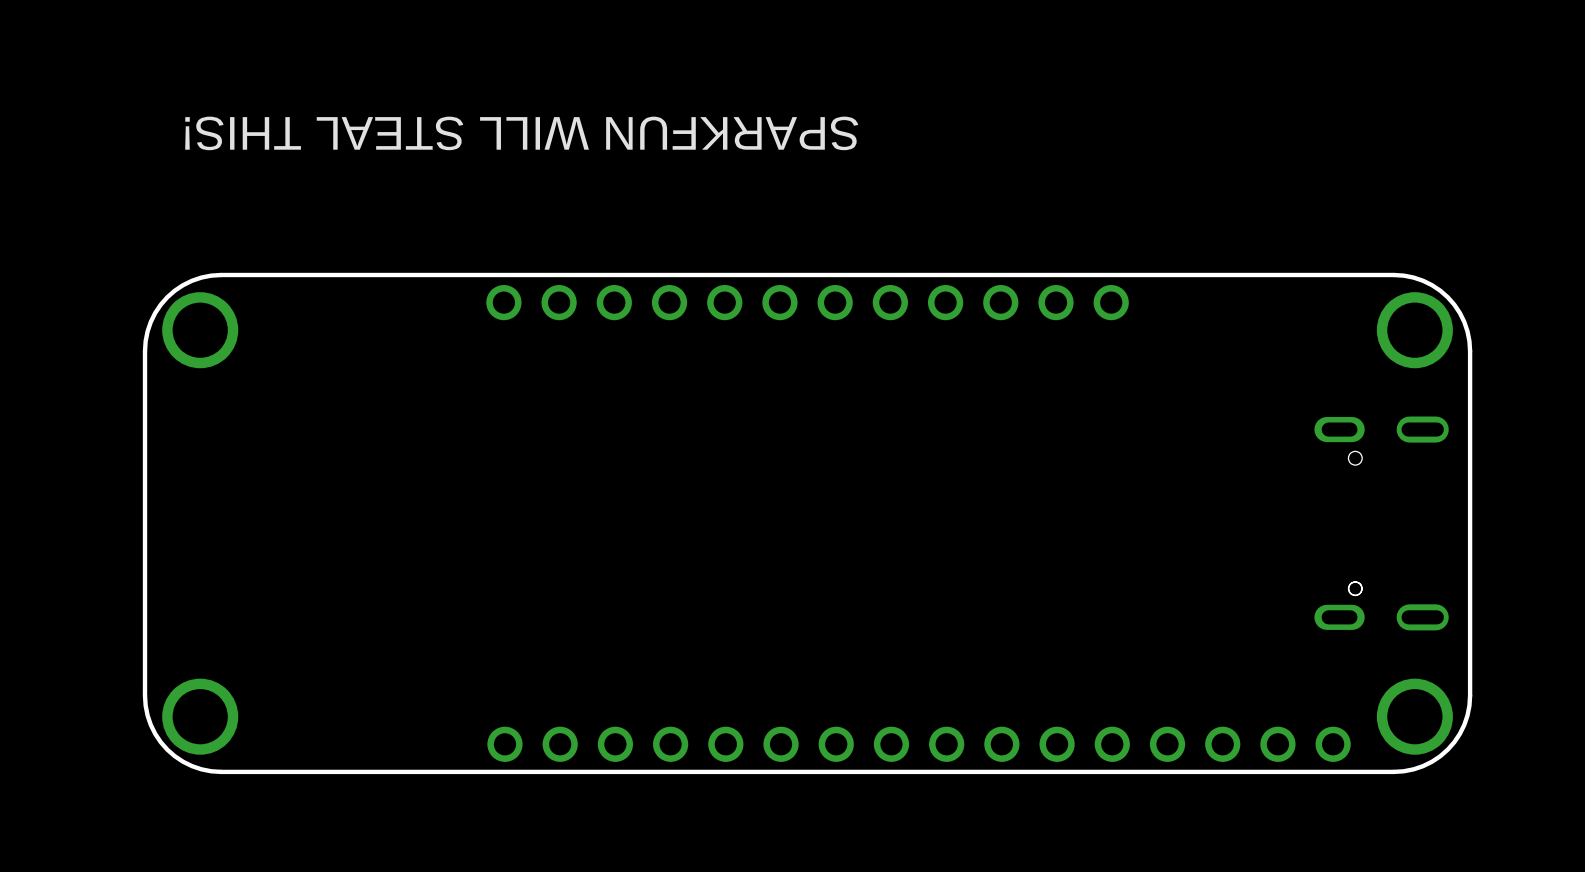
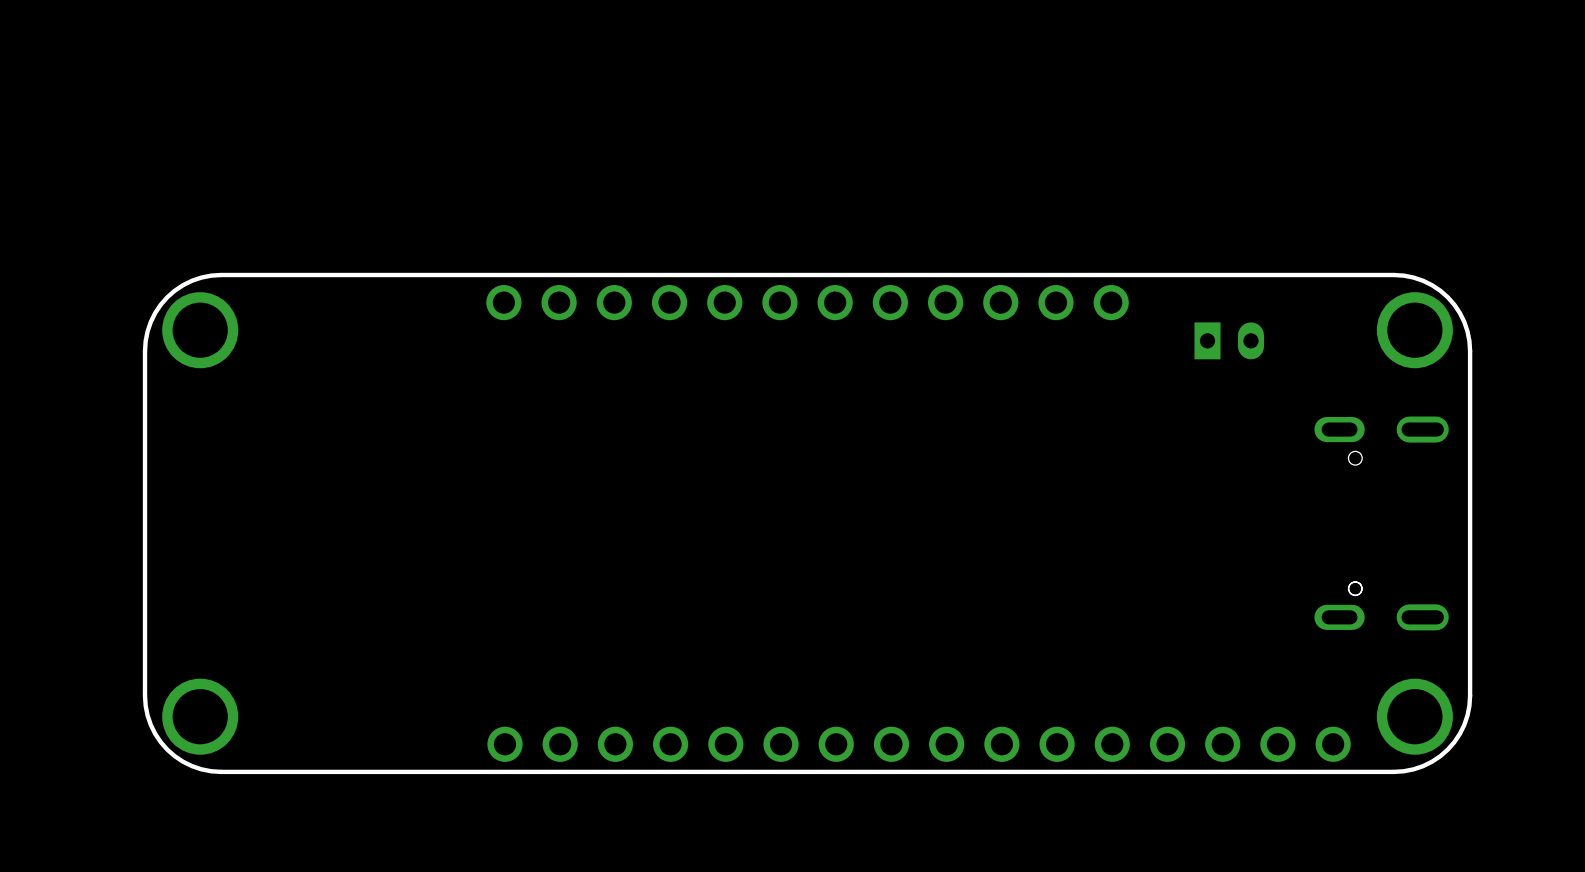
text: SPARKFUN WILL STEAL THIS! (521, 133) -> none
part: none -> (1229, 340)

